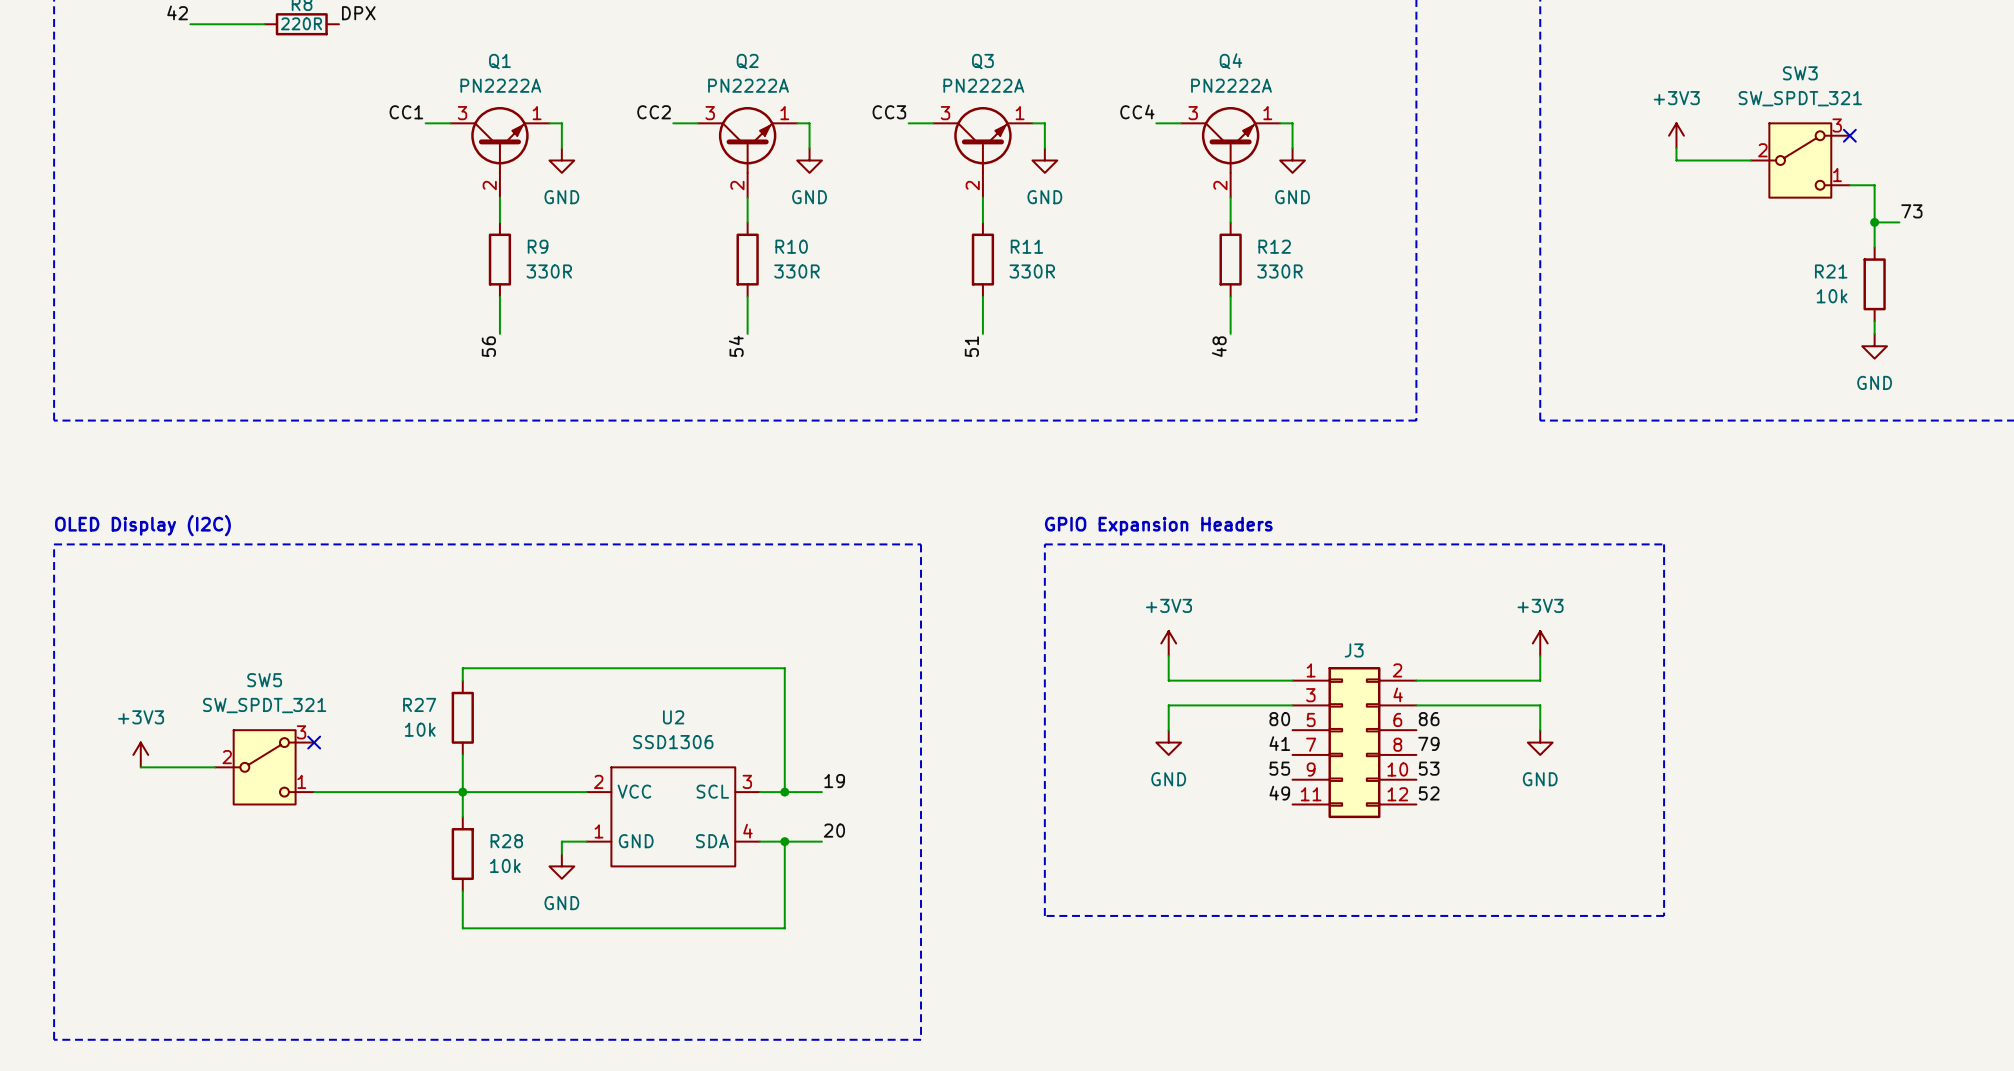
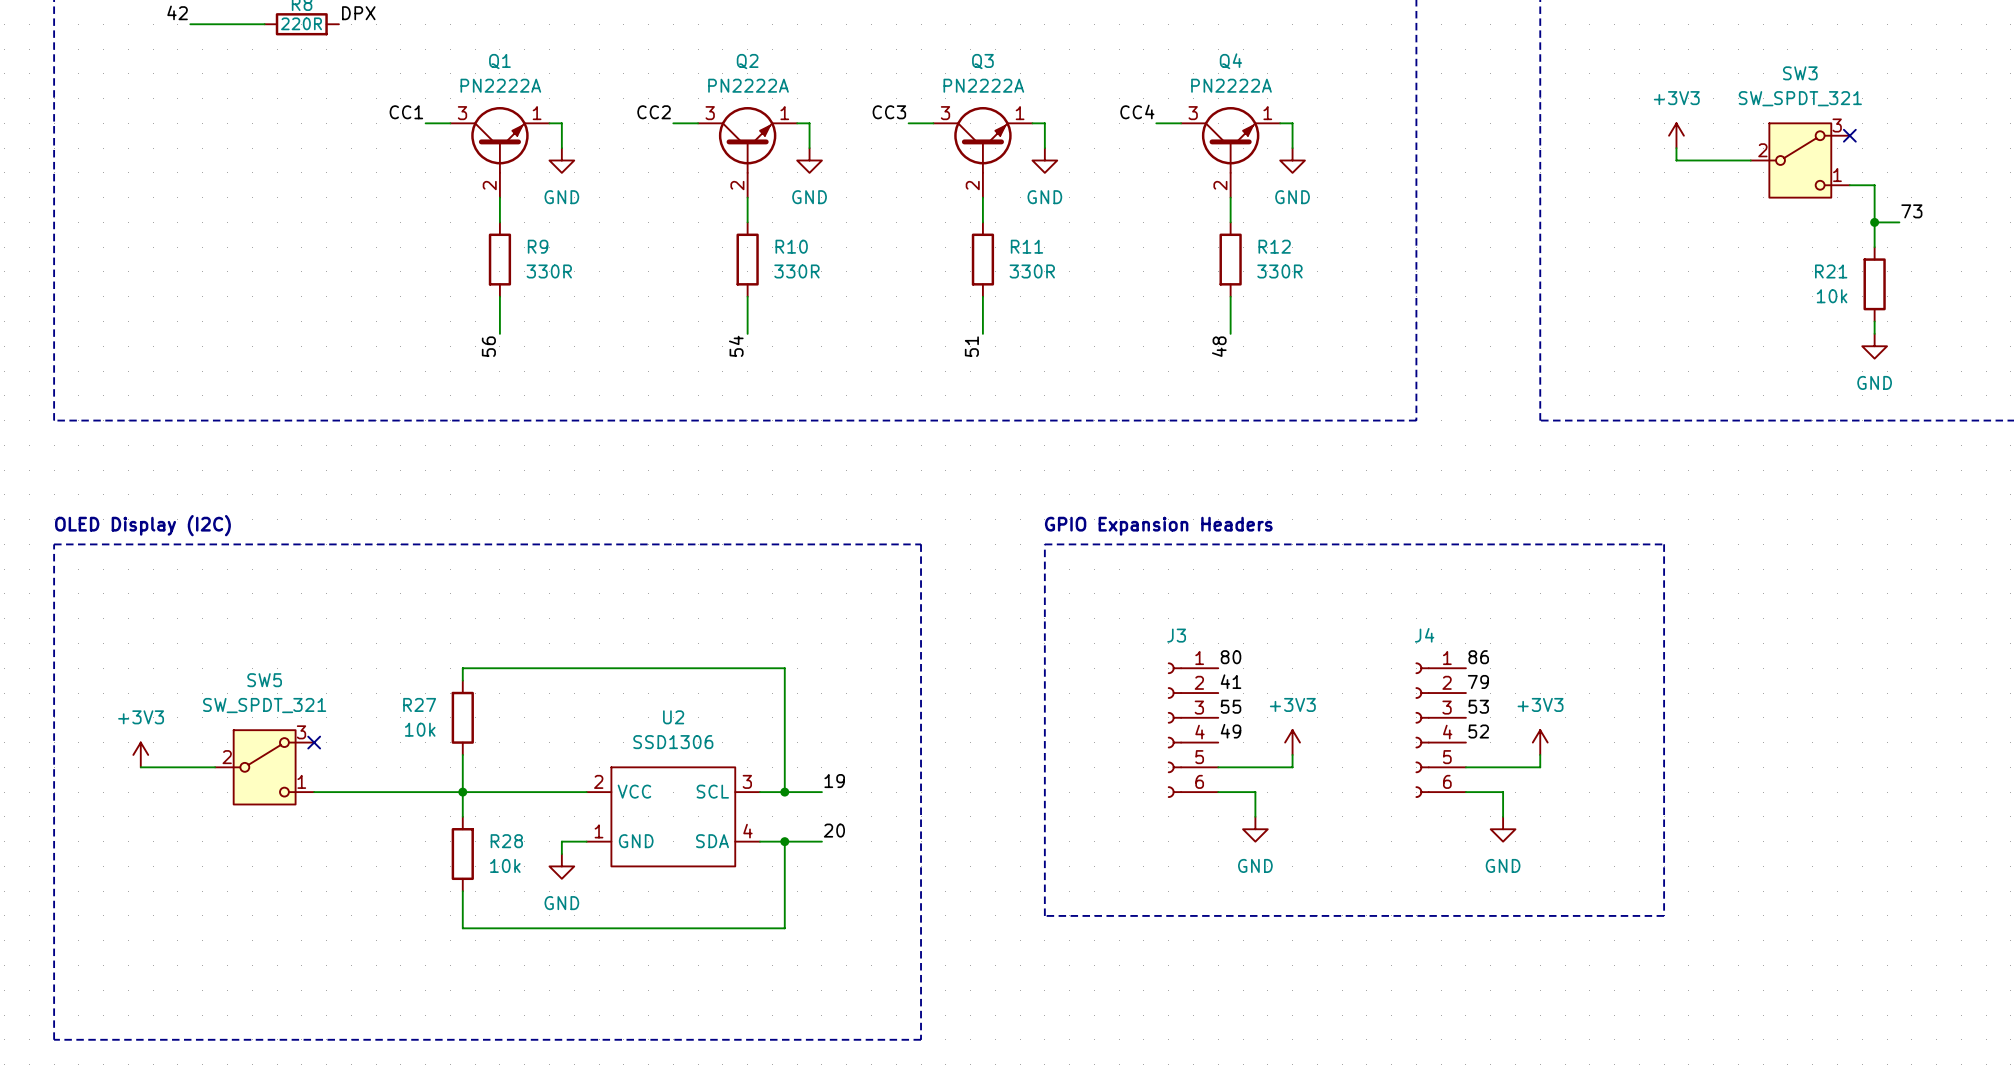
power symbol: +3V3 (1168, 643) -> none
power symbol: +3V3 (1540, 643) -> none
wire: (1168, 655) (1168, 680) (1292, 680) -> none
wire: (1540, 655) (1540, 680) (1416, 680) -> none
J3 symbol: [1292, 667, 1417, 819] -> [1167, 662, 1219, 798]
wire: (1292, 705) (1168, 705) (1168, 730) -> none
wire: (1416, 705) (1540, 705) (1540, 730) -> none
label position: 80 (1279, 719) -> 80 (1231, 657)
label position: 86 (1429, 719) -> 86 (1478, 657)
J4: none -> (1440, 730)
power symbol position: GND (1168, 742) -> GND (1255, 829)
power symbol: none -> +3V3 (1292, 742)
power symbol: GND (1540, 742) -> +3V3 (1540, 742)
label position: 41 (1279, 743) -> 41 (1231, 681)
label position: 79 (1428, 743) -> 79 (1478, 681)
wire: none -> (1292, 754) (1292, 767) (1218, 767)
wire: none -> (1540, 754) (1540, 767) (1465, 767)
label position: 55 (1279, 768) -> 55 (1231, 706)
label position: 53 (1429, 768) -> 53 (1478, 706)
wire: none -> (1218, 792) (1255, 792) (1255, 816)
wire: none -> (1465, 792) (1503, 792) (1503, 816)
label position: 49 (1279, 793) -> 49 (1231, 731)
label position: 52 (1429, 793) -> 52 (1478, 731)
power symbol: none -> GND (1503, 829)

